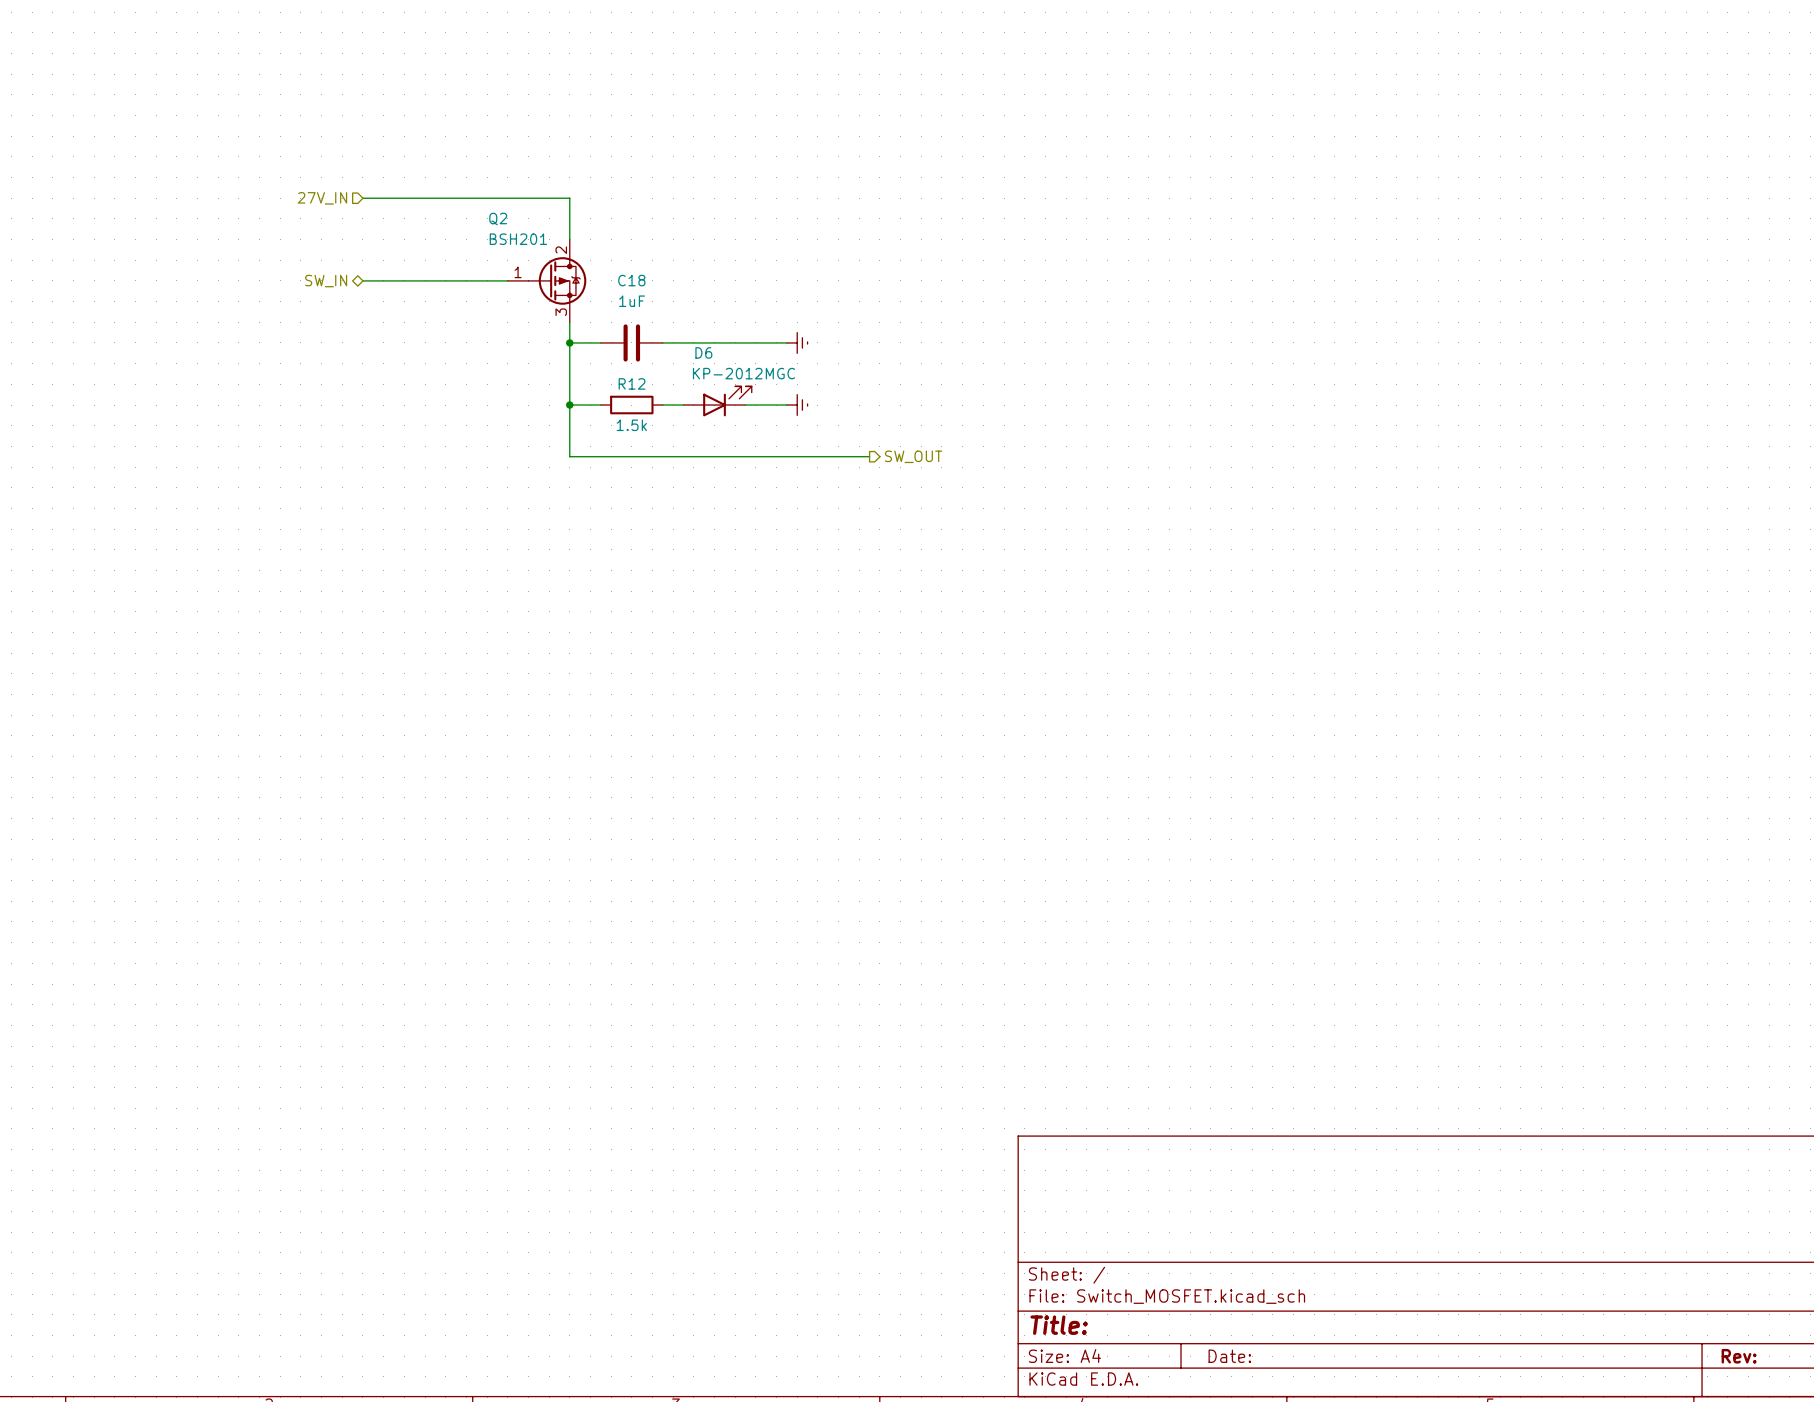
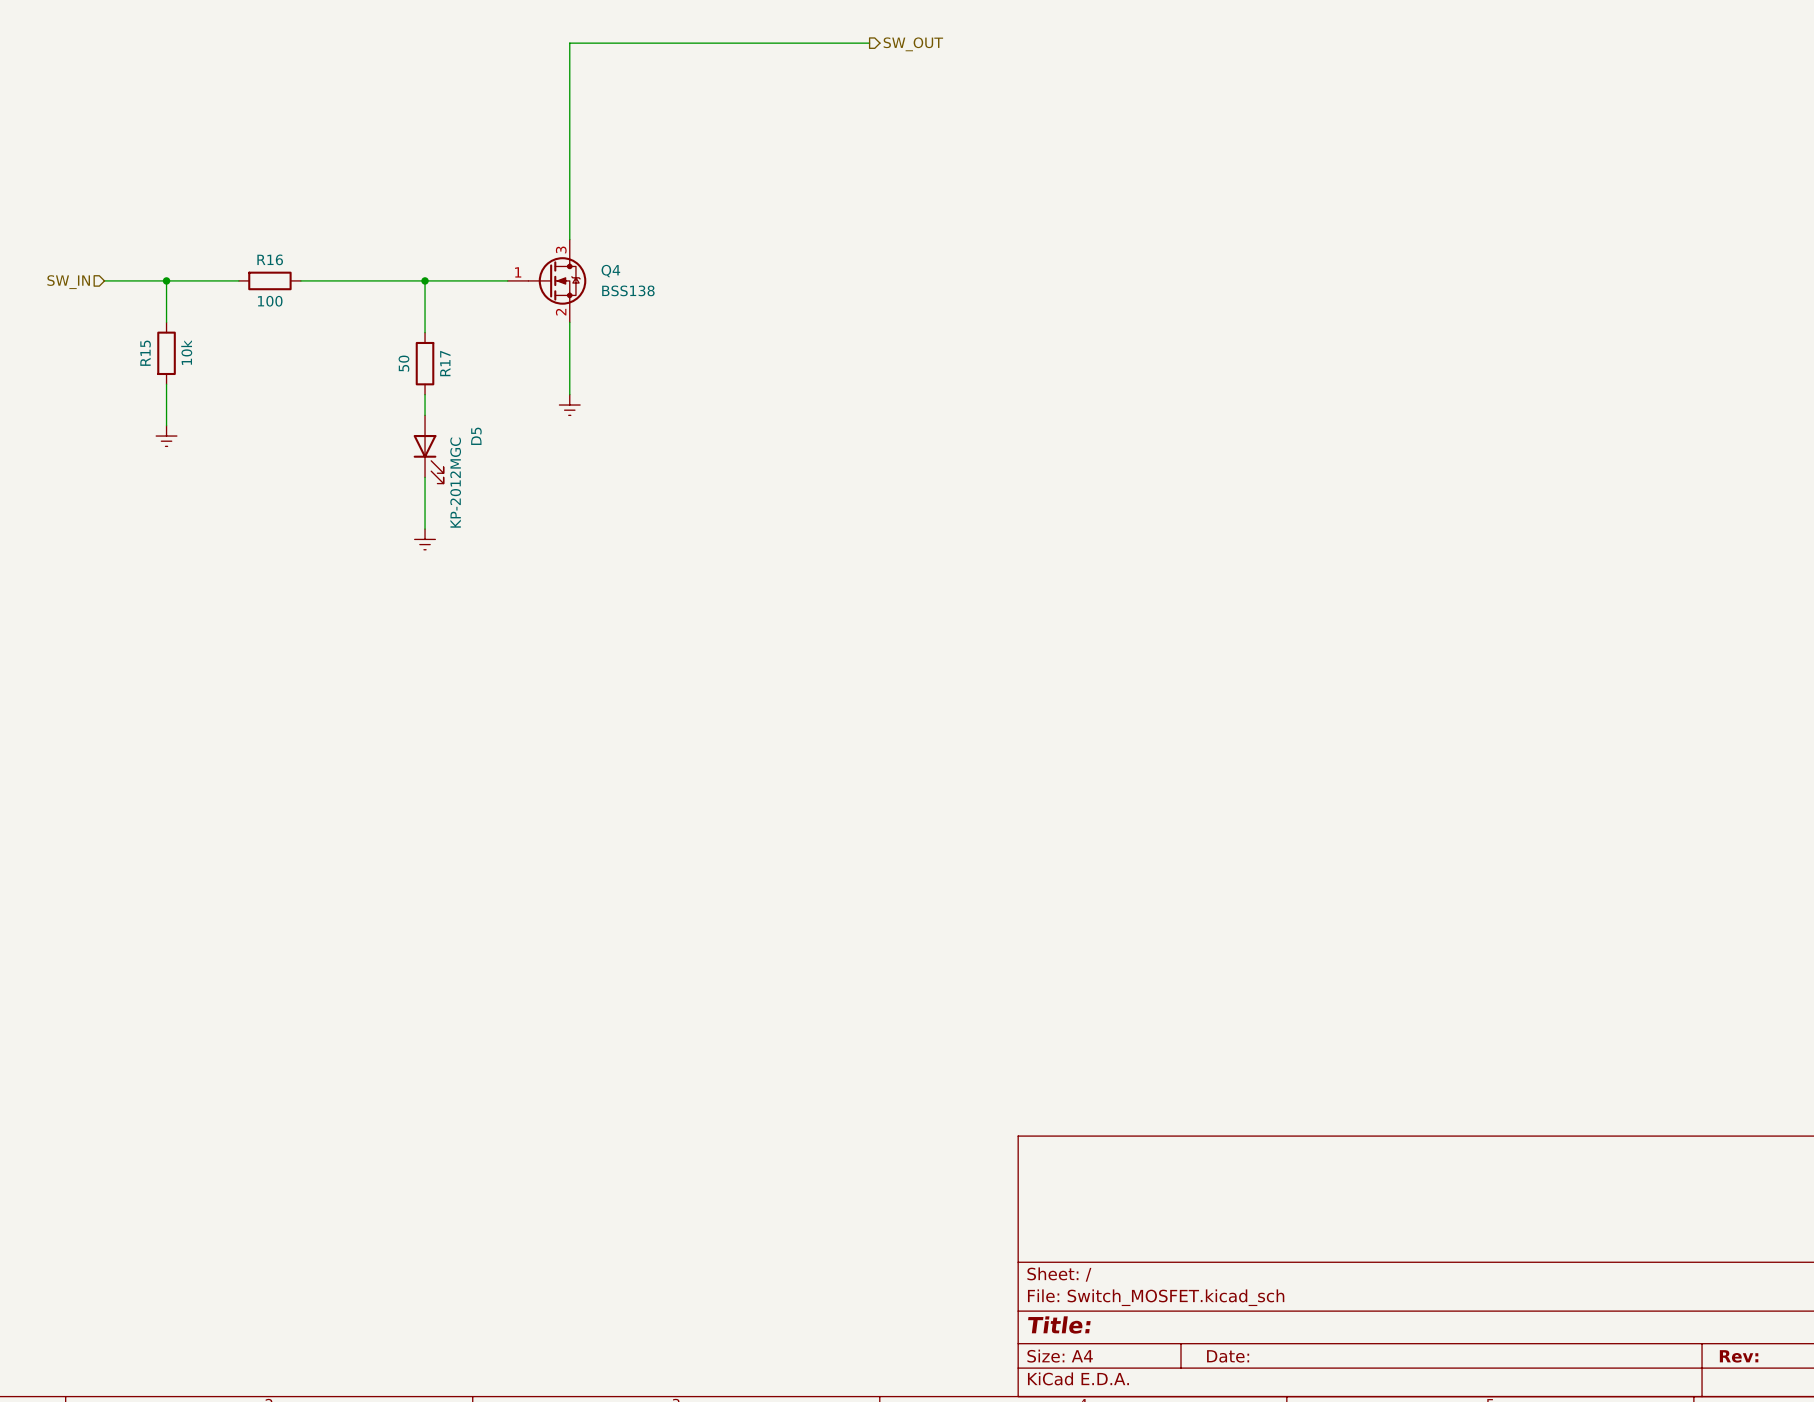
hierarchical label: none -> SW_OUT (913, 44)
hierarchical label: 27V_IN (322, 198) -> none
wire: (362, 198) (569, 198) -> (869, 43) (569, 43) (569, 198)
wire: none -> (104, 280) (238, 280)
wire: none -> (166, 280) (166, 322)
junction: none -> (166, 280)
R16: none -> 100 (269, 280)
wire: none -> (300, 280) (362, 280)
wire: none -> (425, 280) (425, 332)
junction: none -> (425, 280)
Q2: BSH201 (547, 280) -> none
Q4: none -> BSS138 (547, 280)
hierarchical label: none -> SW_IN (68, 282)
hierarchical label: SW_IN (326, 281) -> none
wire: (569, 342) (600, 342) -> none
junction: (569, 342) -> none
C18: 1uF (631, 342) -> none
wire: (662, 342) (786, 342) -> none
power symbol: (797, 342) -> none
R15: none -> 10k (166, 353)
R17: none -> 50 (425, 363)
wire: none -> (166, 384) (166, 425)
wire: none -> (425, 394) (425, 415)
wire: (569, 394) (569, 456) (869, 456) -> none
D6: KP-2012MGC (717, 401) -> none
wire: (569, 405) (600, 405) -> none
junction: (569, 405) -> none
power symbol: none -> (569, 405)
R12: 1.5k (631, 405) -> none
wire: (662, 405) (683, 405) -> none
wire: (745, 405) (786, 405) -> none
power symbol: (797, 405) -> none
power symbol: none -> (166, 436)
D5: none -> KP-2012MGC (428, 449)
hierarchical label: SW_OUT (913, 456) -> none
wire: none -> (425, 477) (425, 529)
power symbol: none -> (425, 539)

